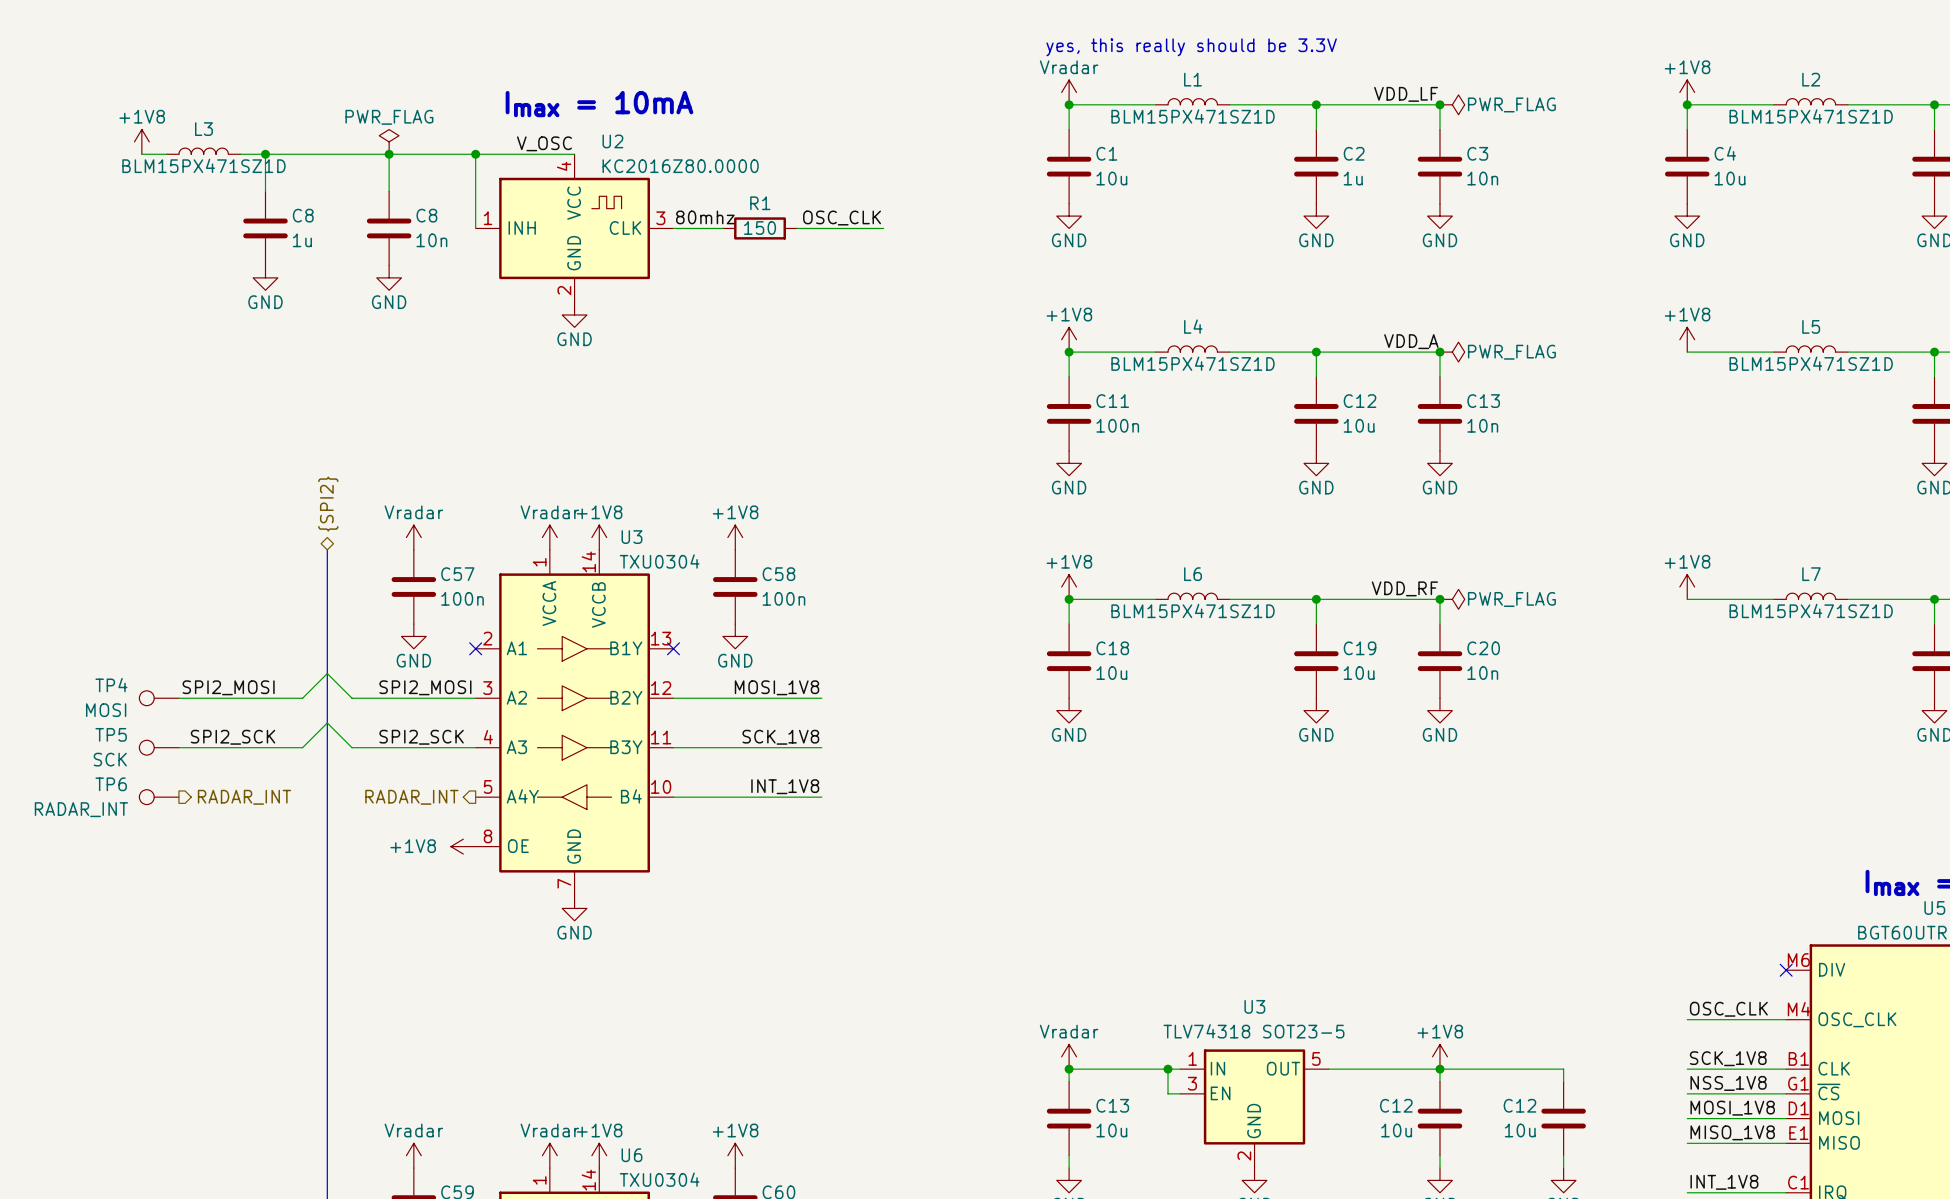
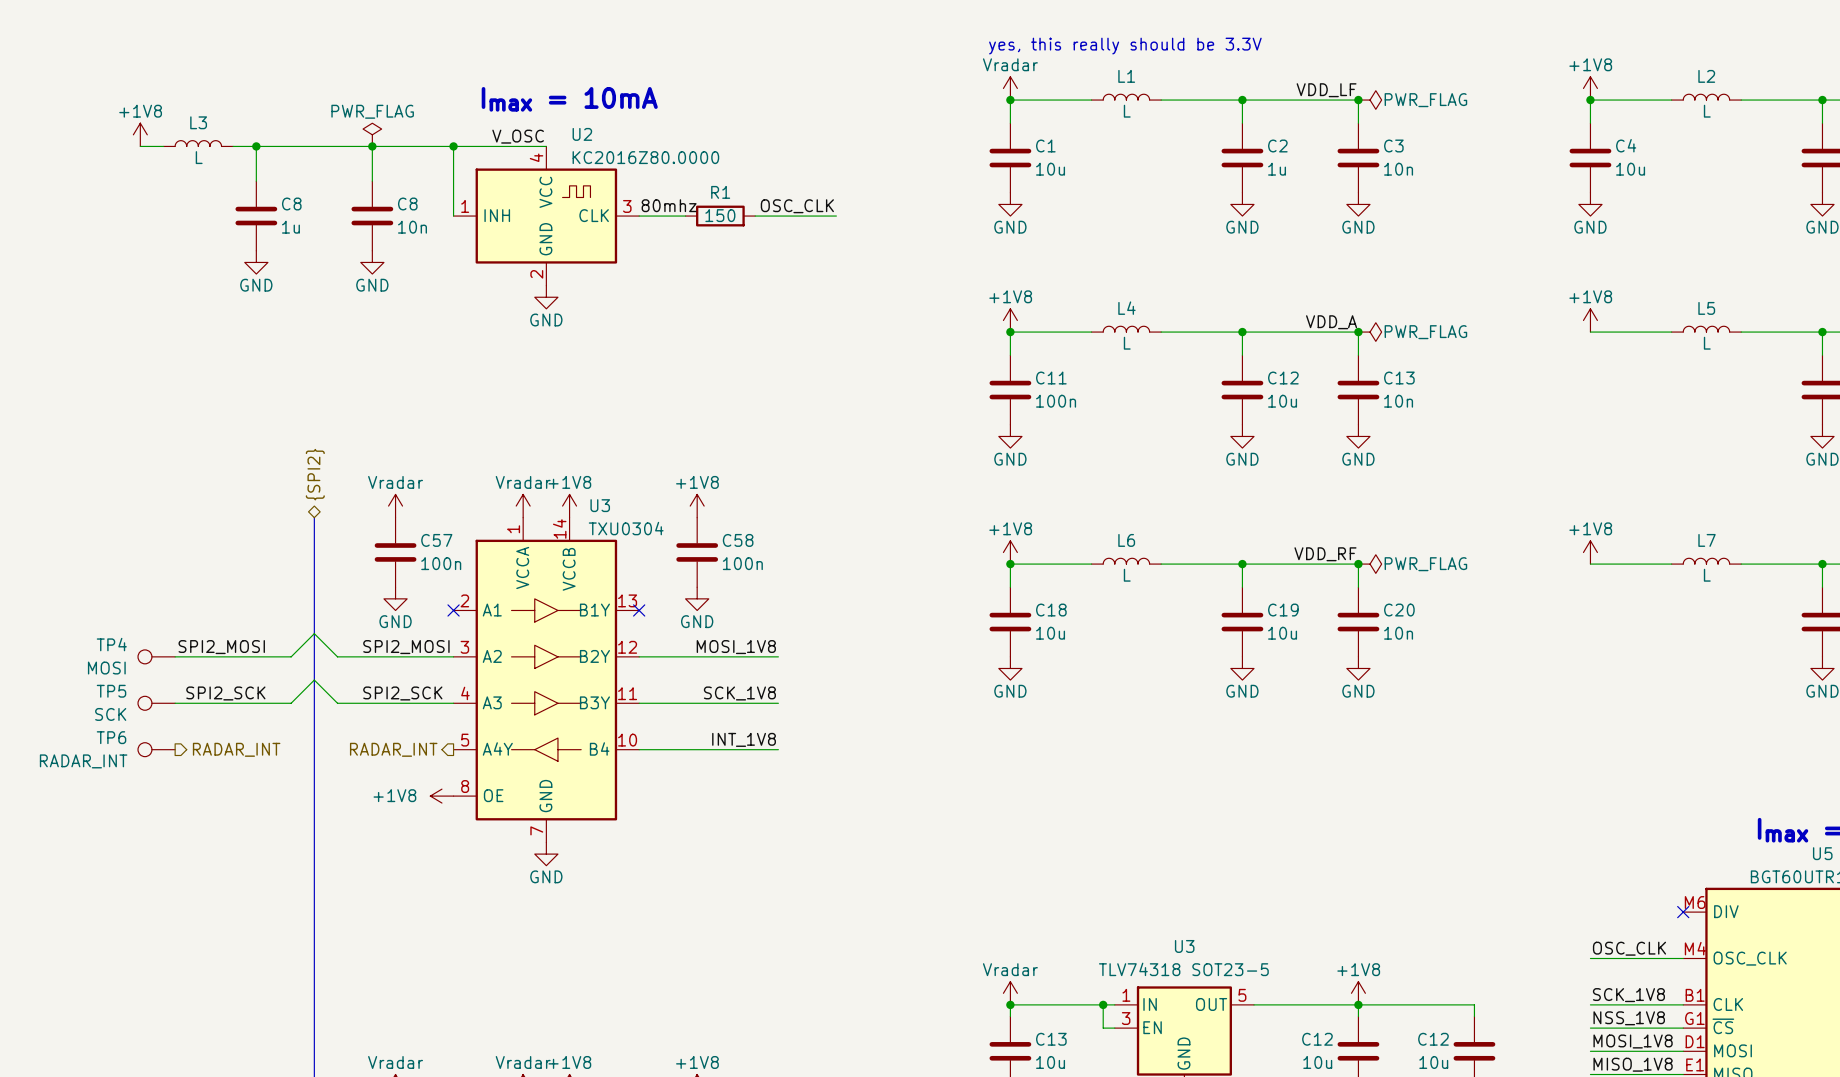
L1 value: BLM15PX471SZ1D (1193, 116) -> L (1127, 111)
L2 value: BLM15PX471SZ1D (1811, 116) -> L (1707, 111)
L3 value: BLM15PX471SZ1D (203, 165) -> L (199, 157)
L4 value: BLM15PX471SZ1D (1193, 363) -> L (1127, 343)
L5 value: BLM15PX471SZ1D (1811, 363) -> L (1707, 343)
L6 value: BLM15PX471SZ1D (1193, 610) -> L (1127, 575)
L7 value: BLM15PX471SZ1D (1811, 610) -> L (1707, 575)

